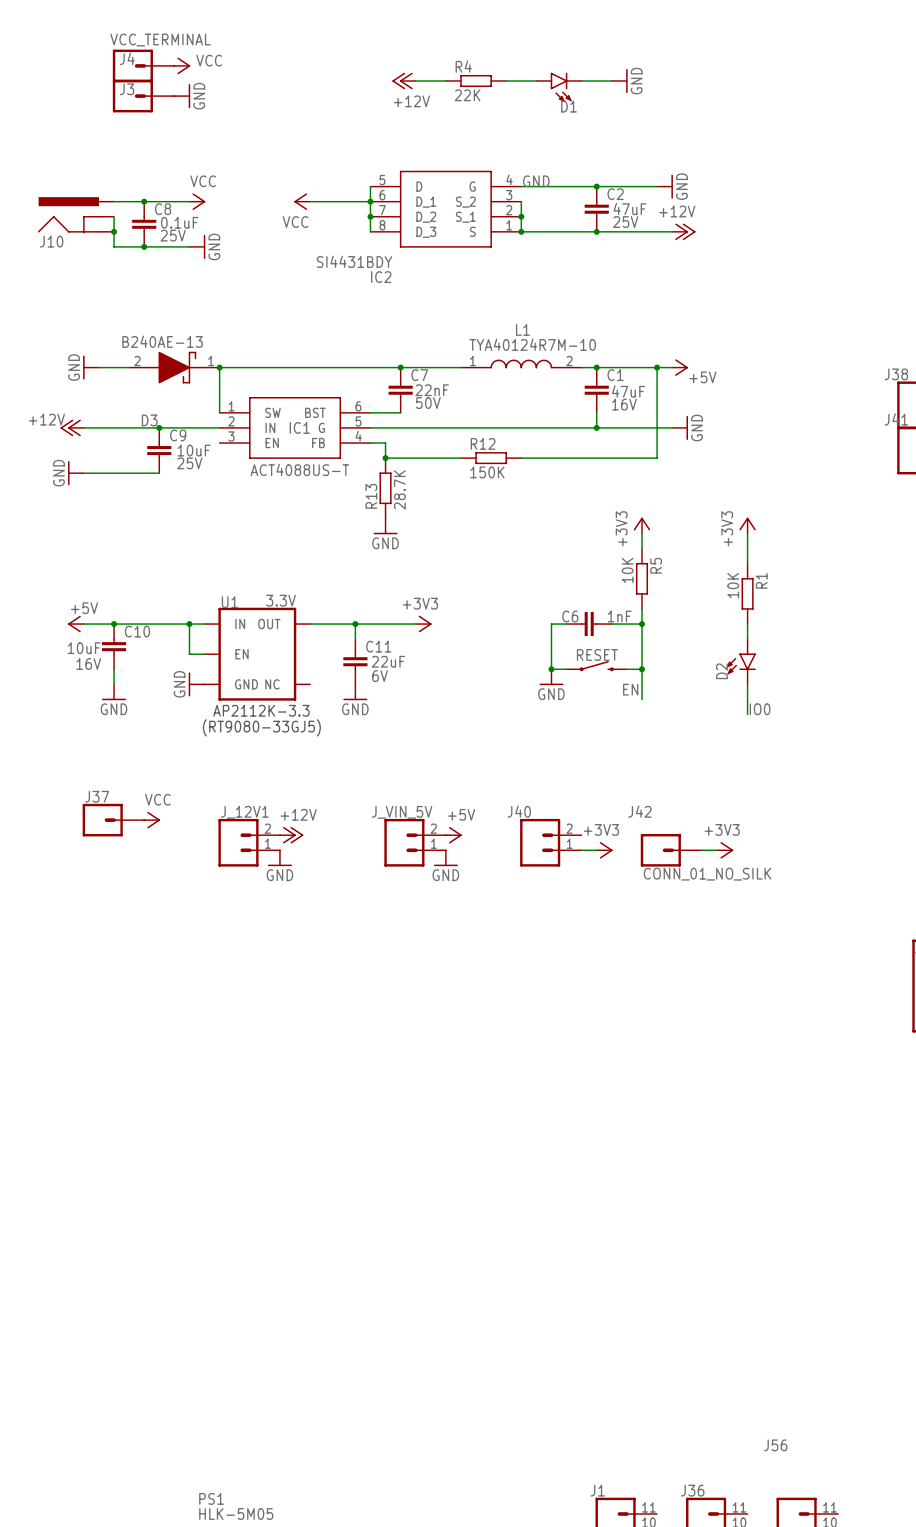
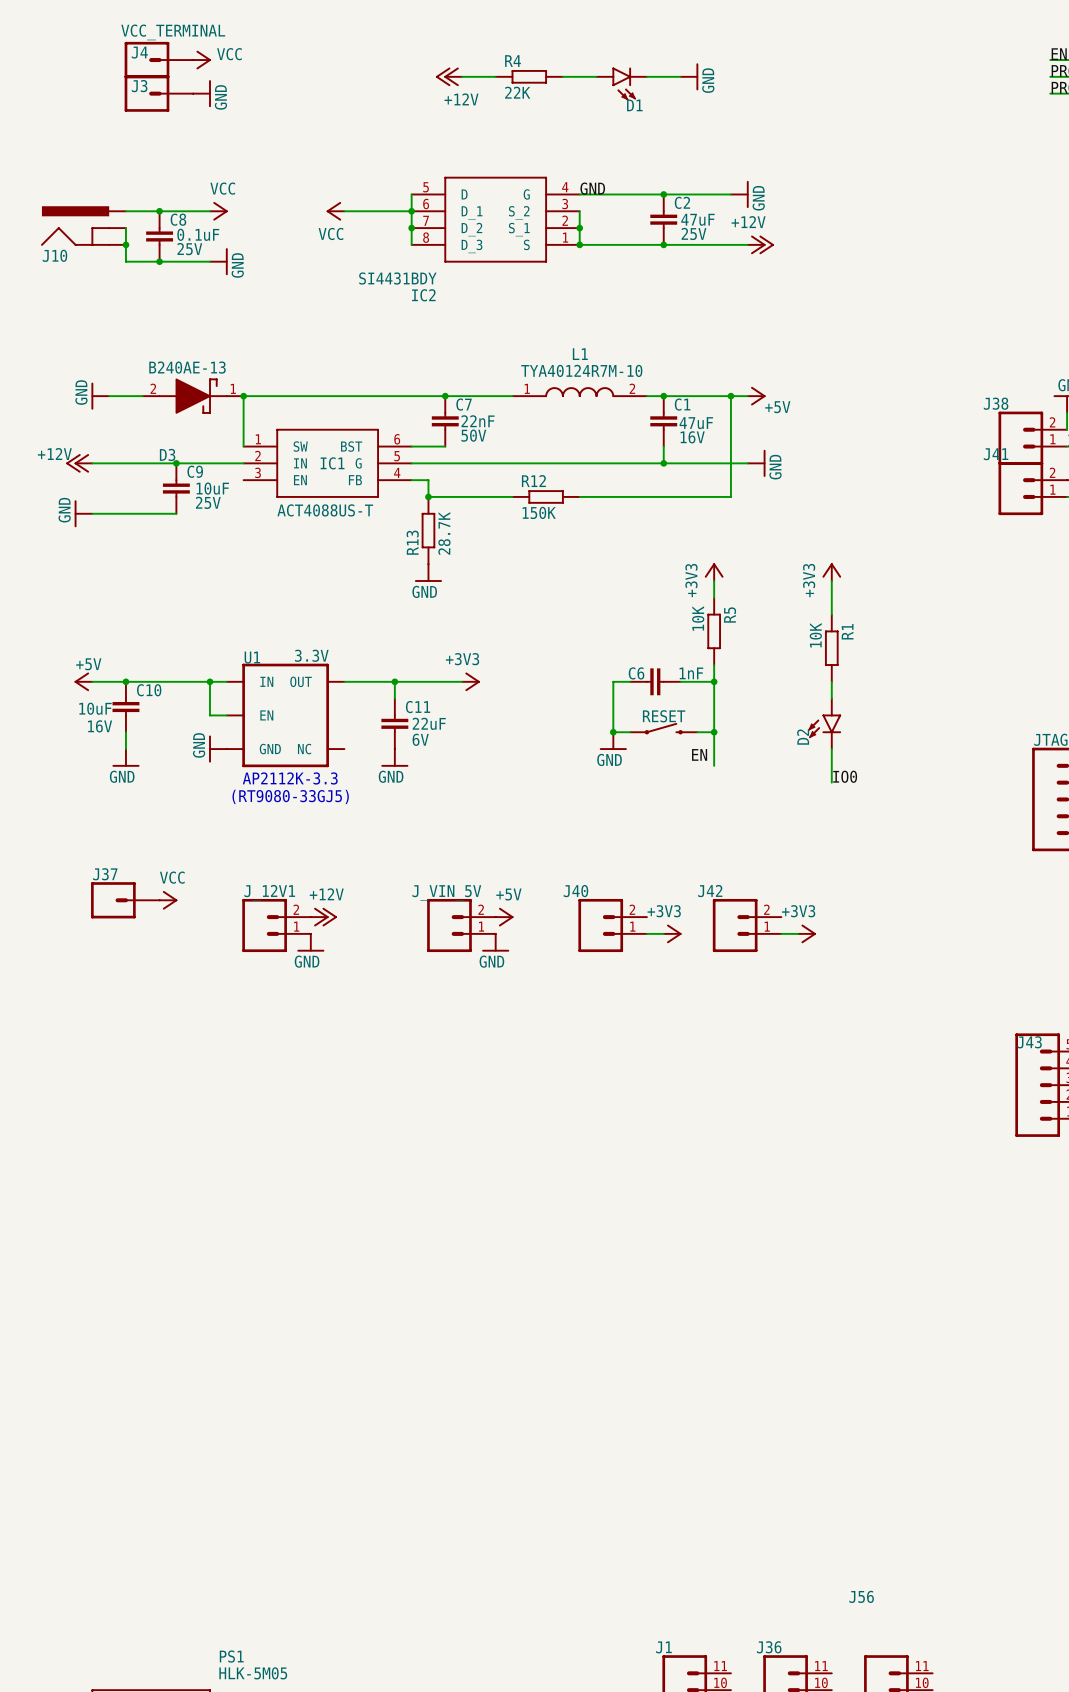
J42 symbol: [640, 834, 703, 867] -> [712, 898, 782, 953]
J42 value: CONN_01_NO_SILK (707, 874) -> none

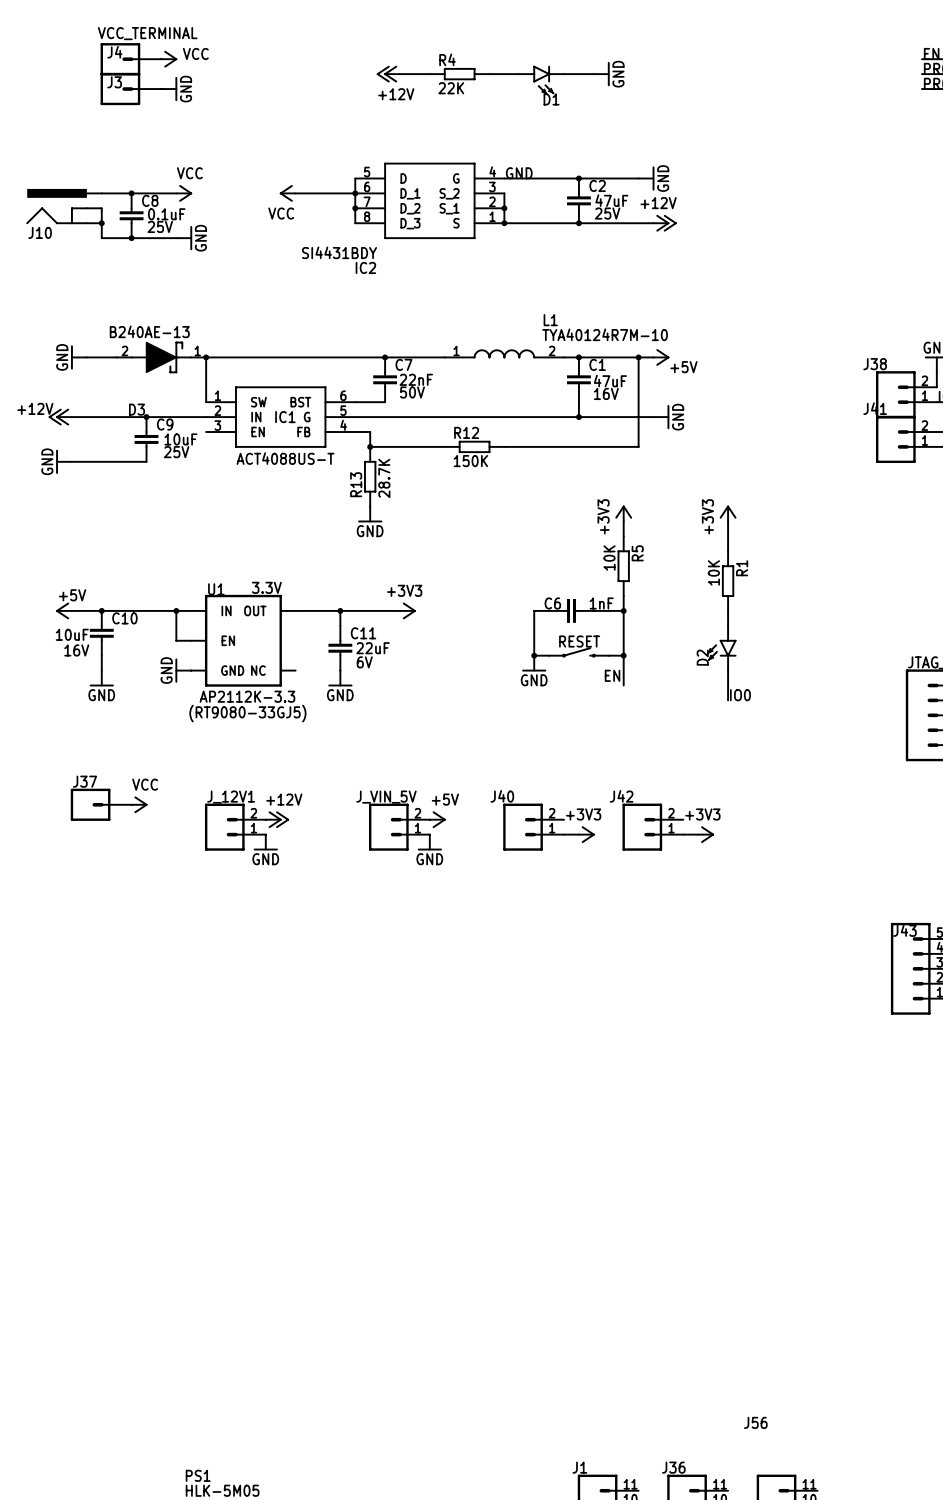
L1 name position: L1 (580, 354) -> L1 (550, 320)
L1 value position: TYA40124R7M-10 (581, 370) -> TYA40124R7M-10 (605, 334)

